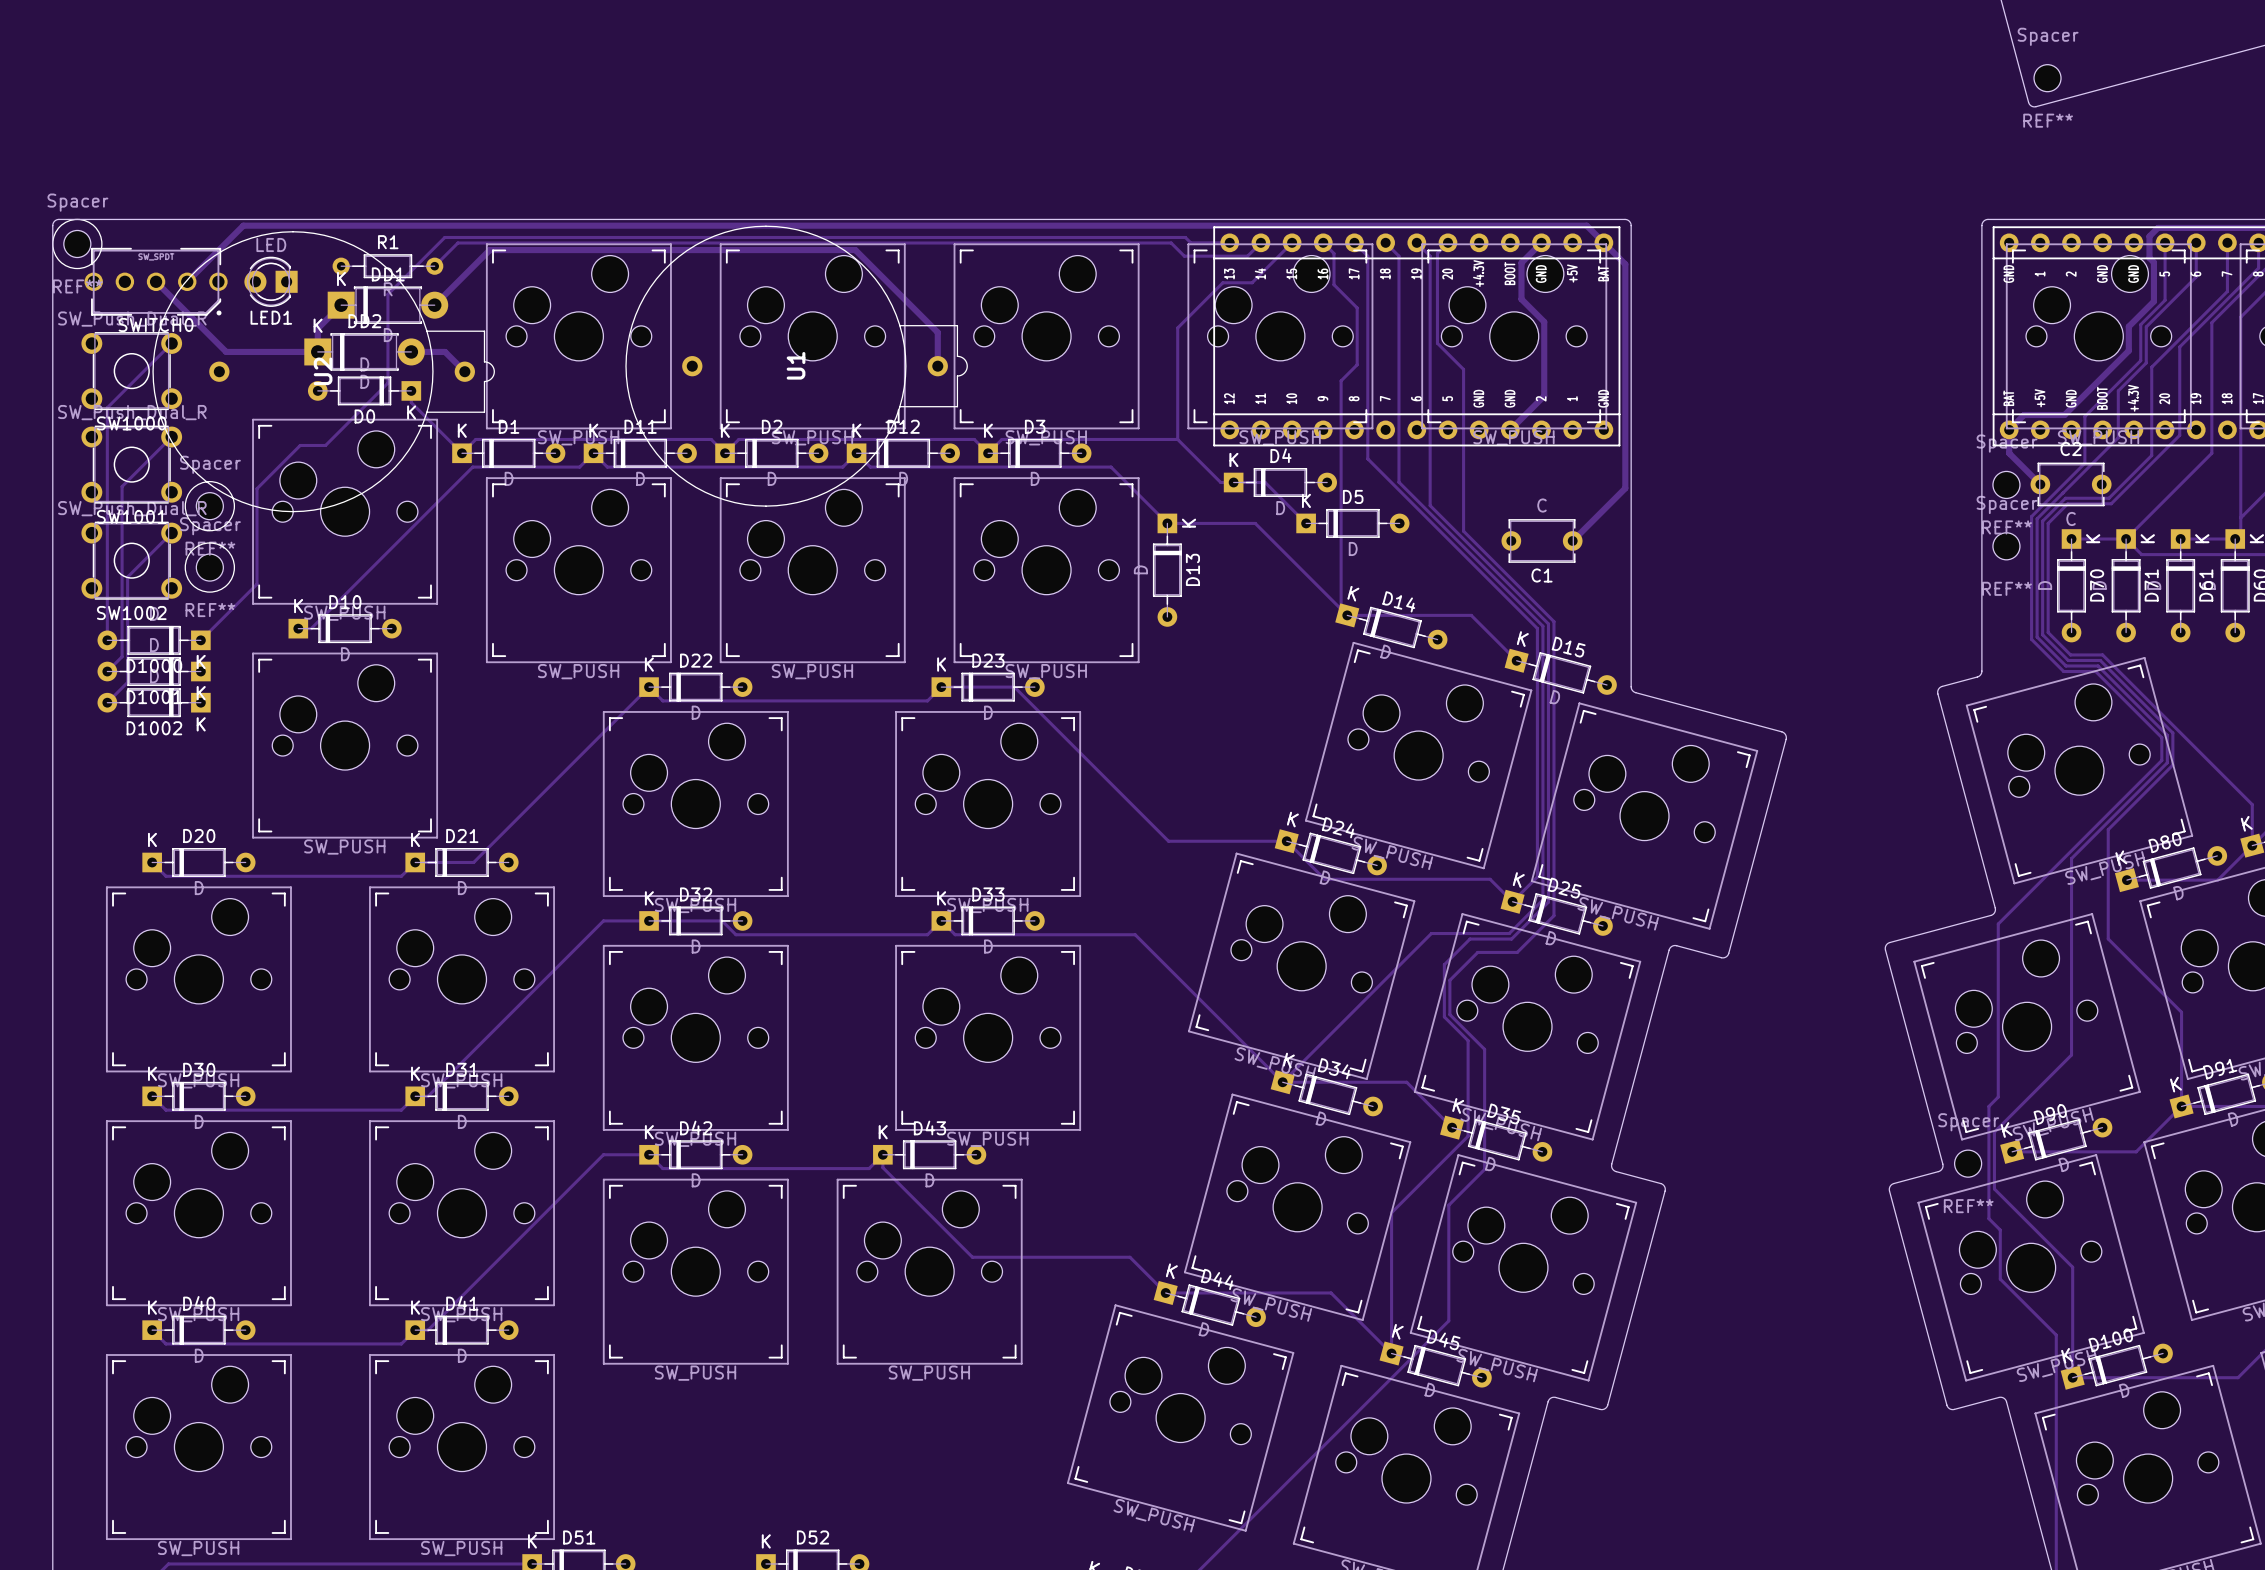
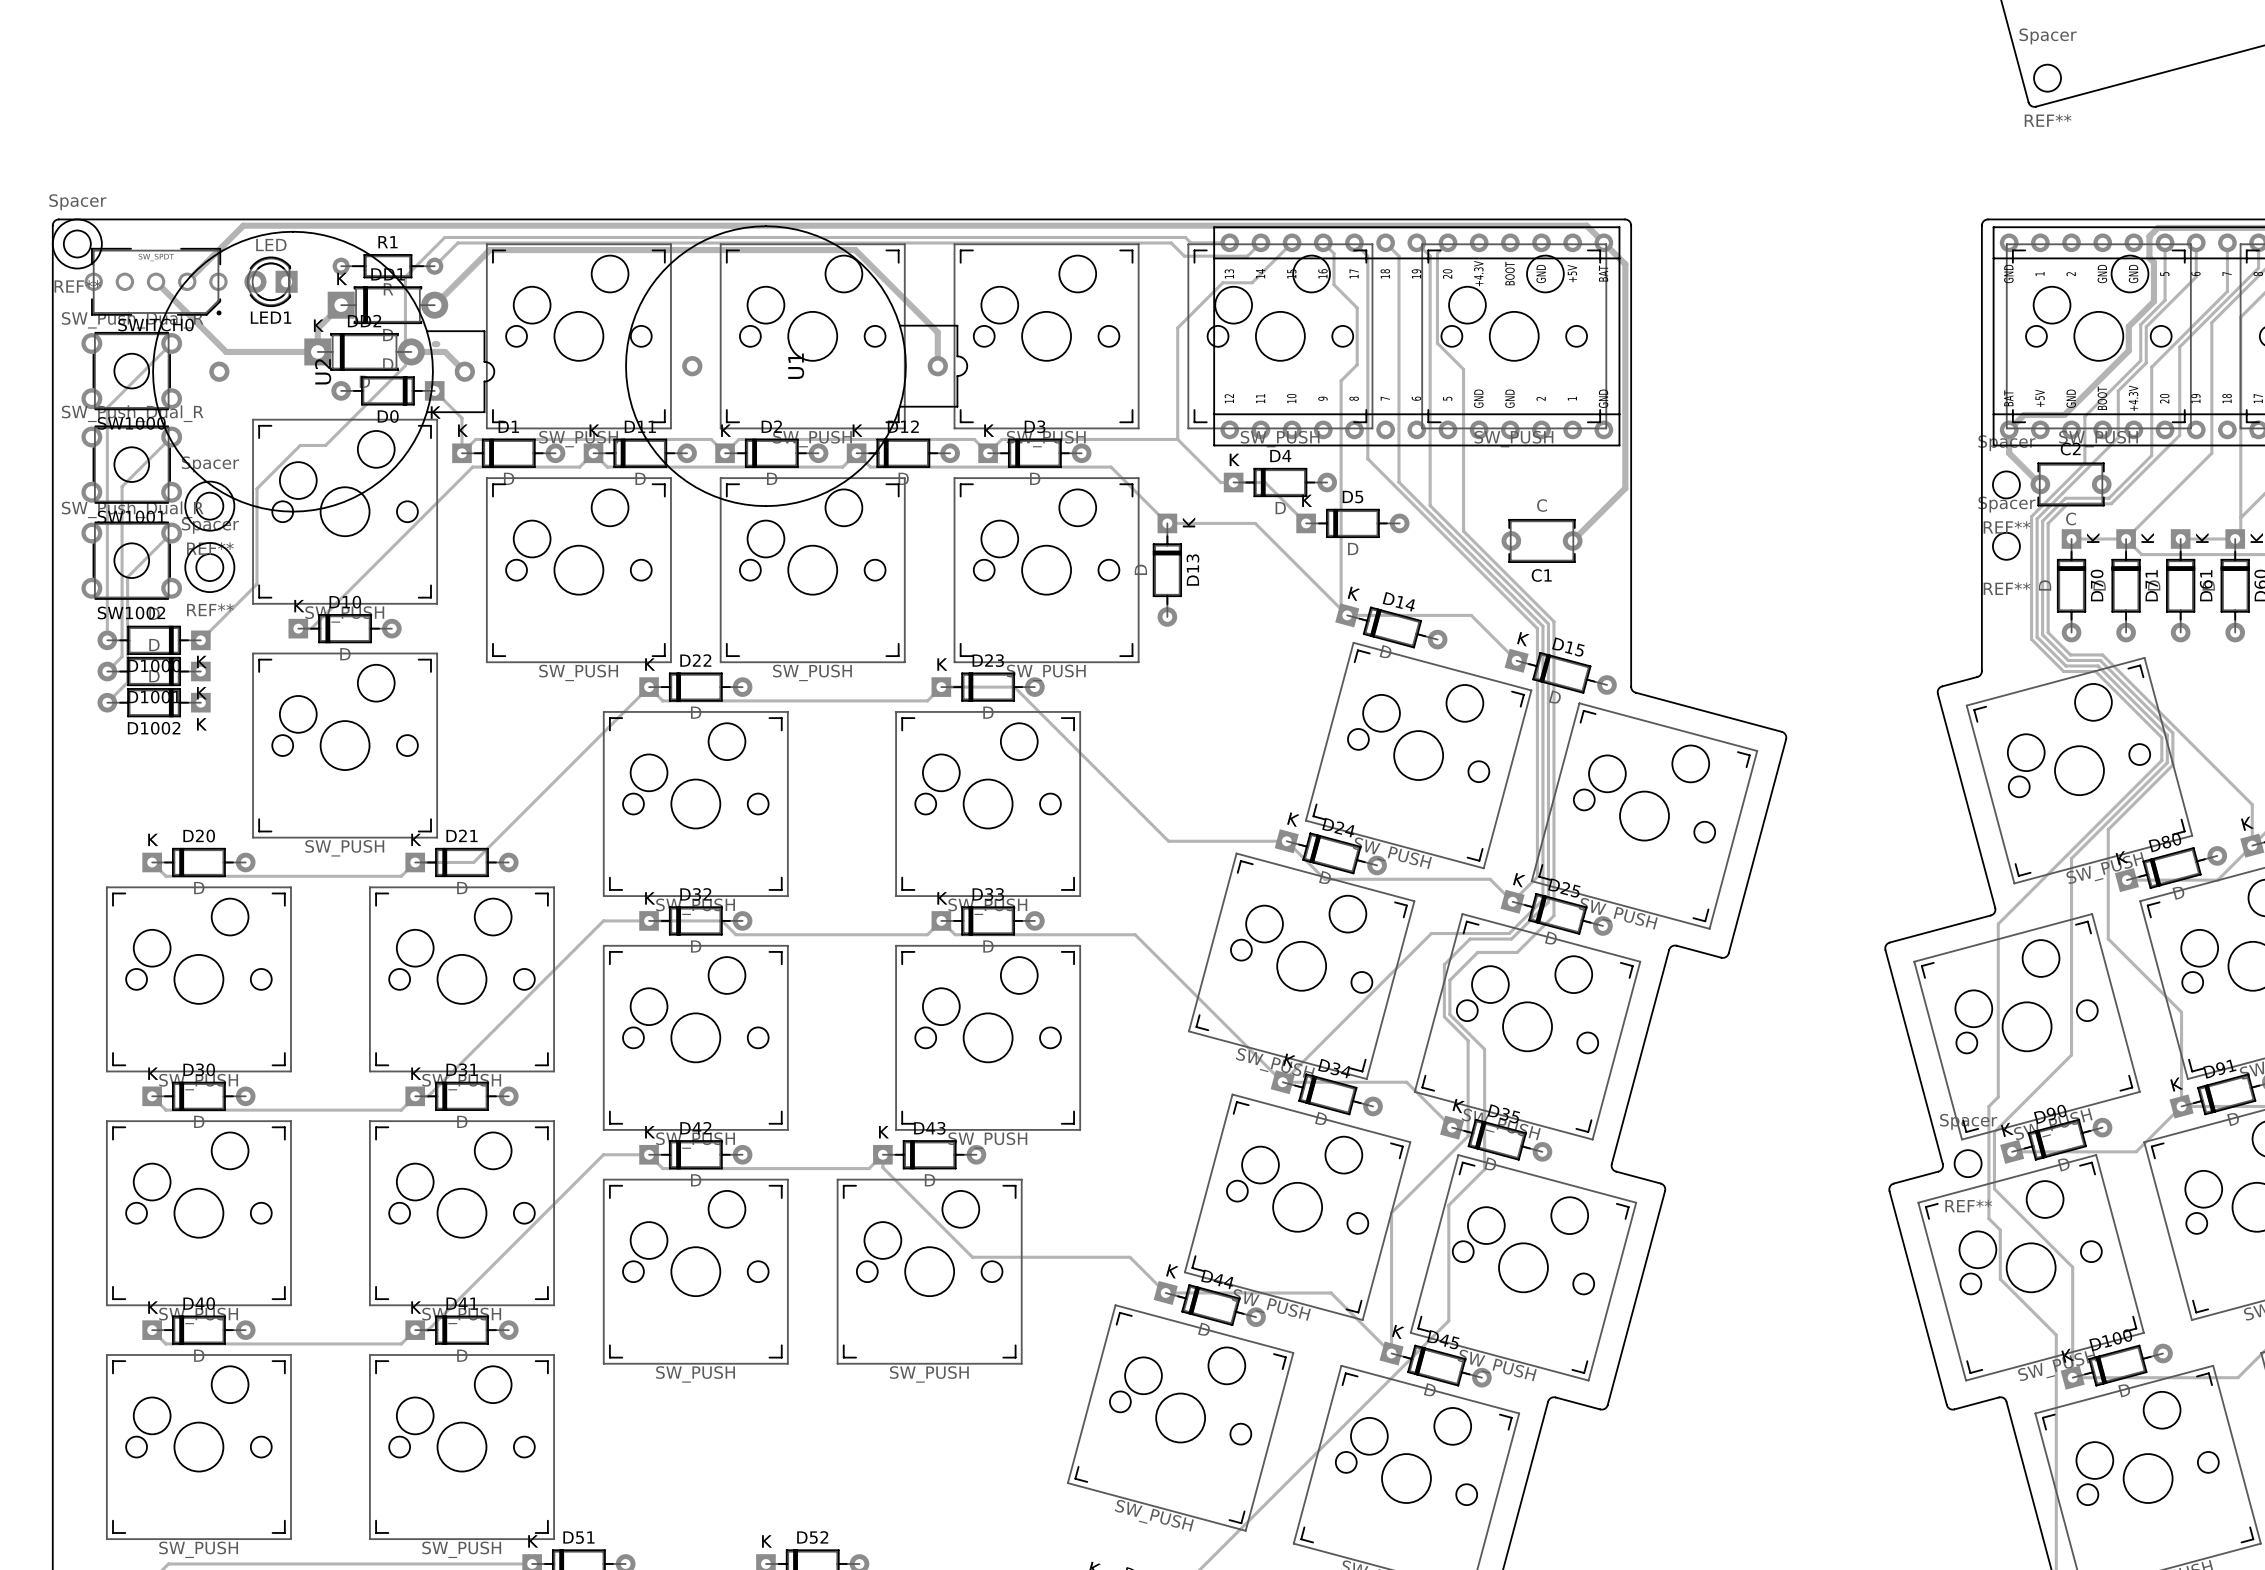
track: (1541, 242) (1521, 262) (1521, 299) (1544, 321) (1544, 396) (1510, 429) -> none
track: (405, 276) (387, 294) (387, 383) -> (405, 276) (405, 365) (387, 383)
track: none -> (434, 344) (437, 344)
D0 position: (364, 390) -> (387, 390)
track: (411, 390) (411, 402) (461, 453) -> (434, 390) (461, 418) (461, 453)

